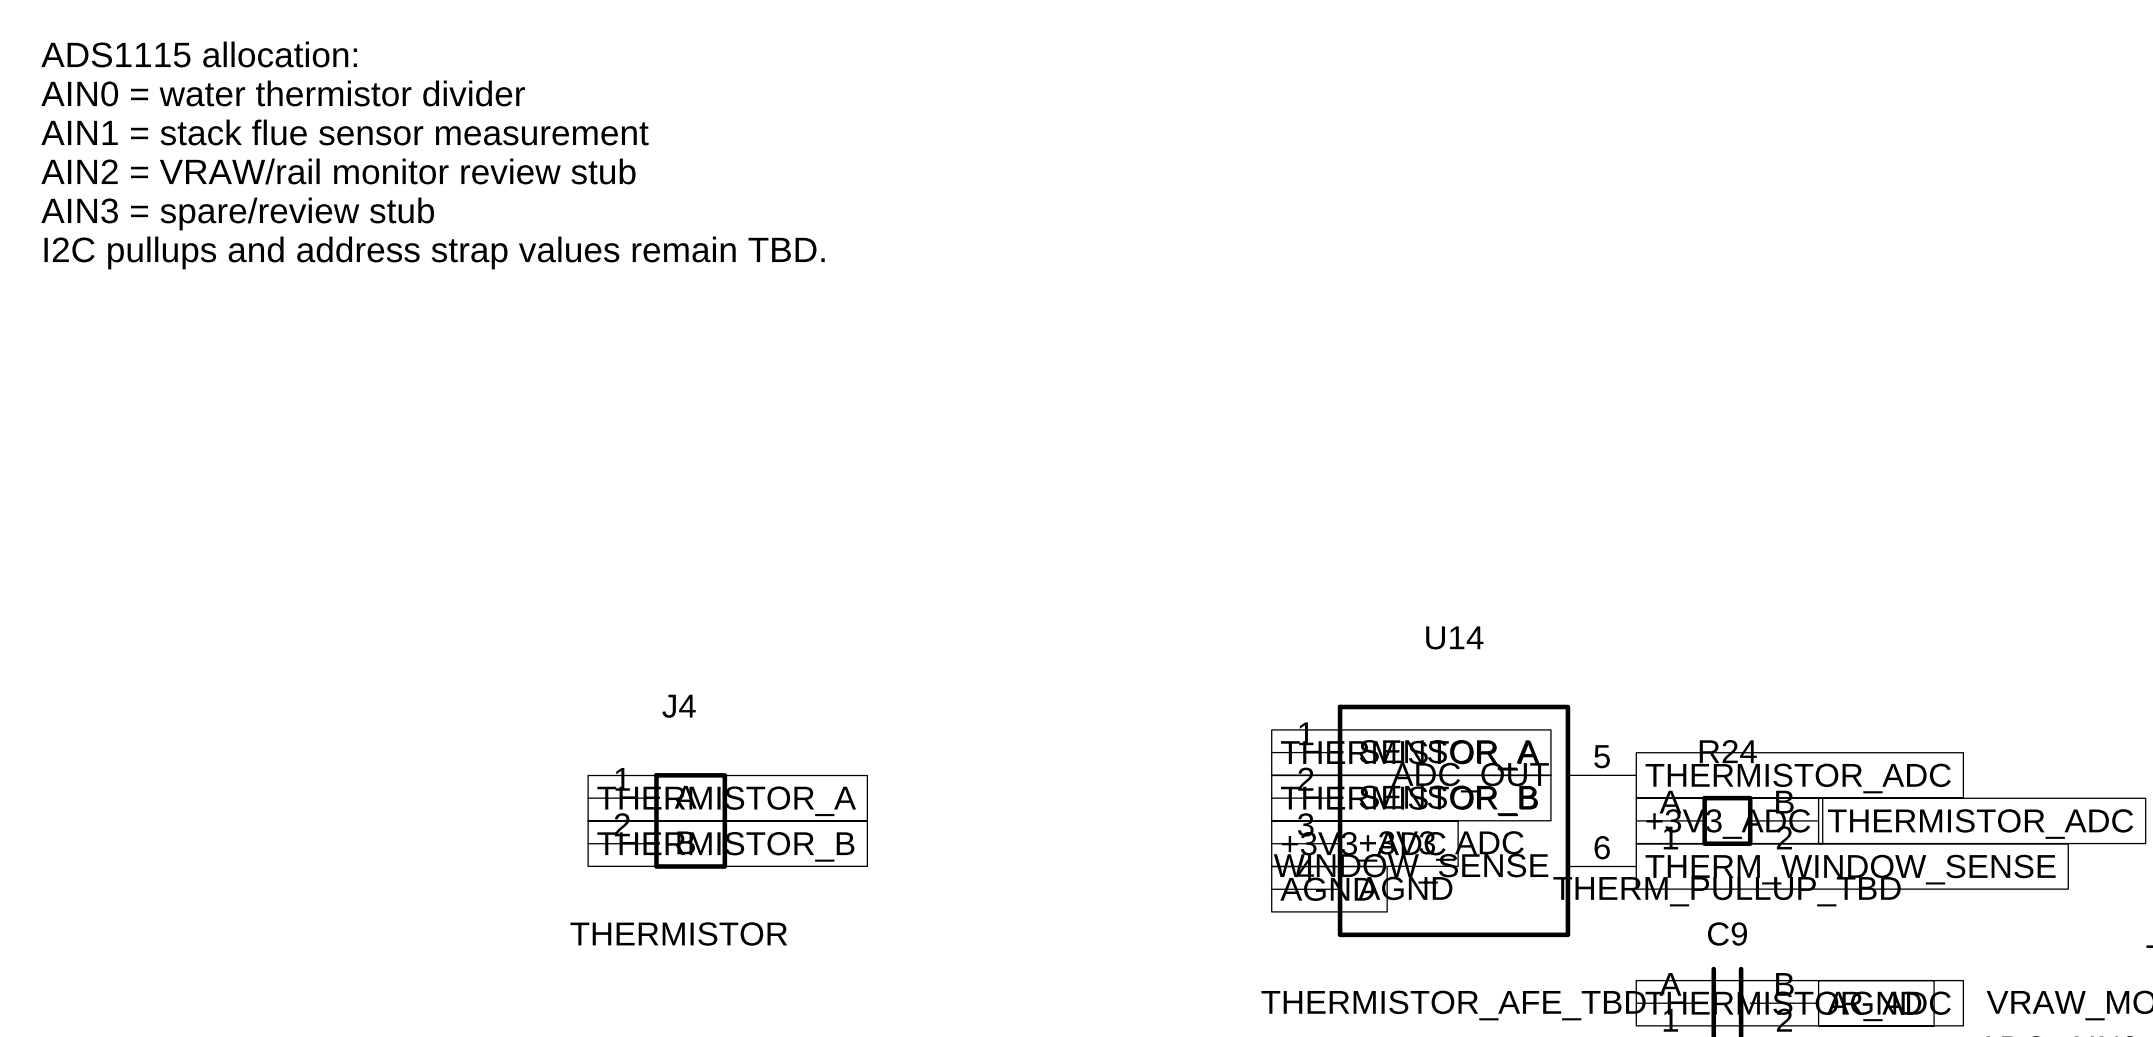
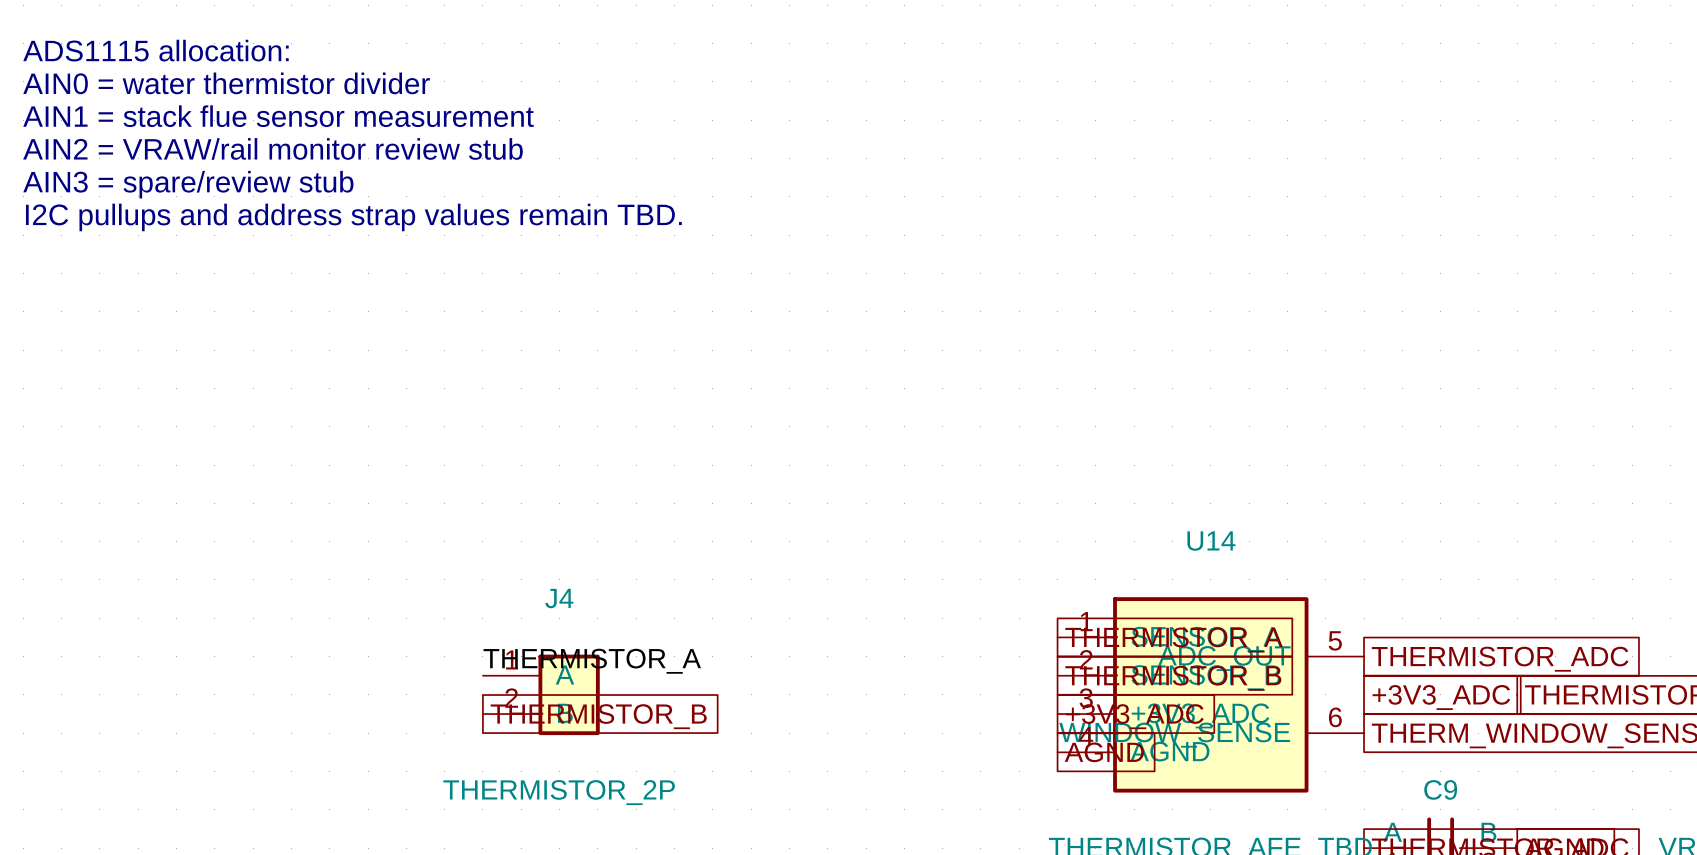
label: none -> THERMISTOR_A (592, 661)
global label: THERMISTOR_A (726, 801) -> none
R24: THERM_PULLUP_TBD (1727, 820) -> none
J4 value: THERMISTOR (678, 934) -> THERMISTOR_2P (559, 792)

